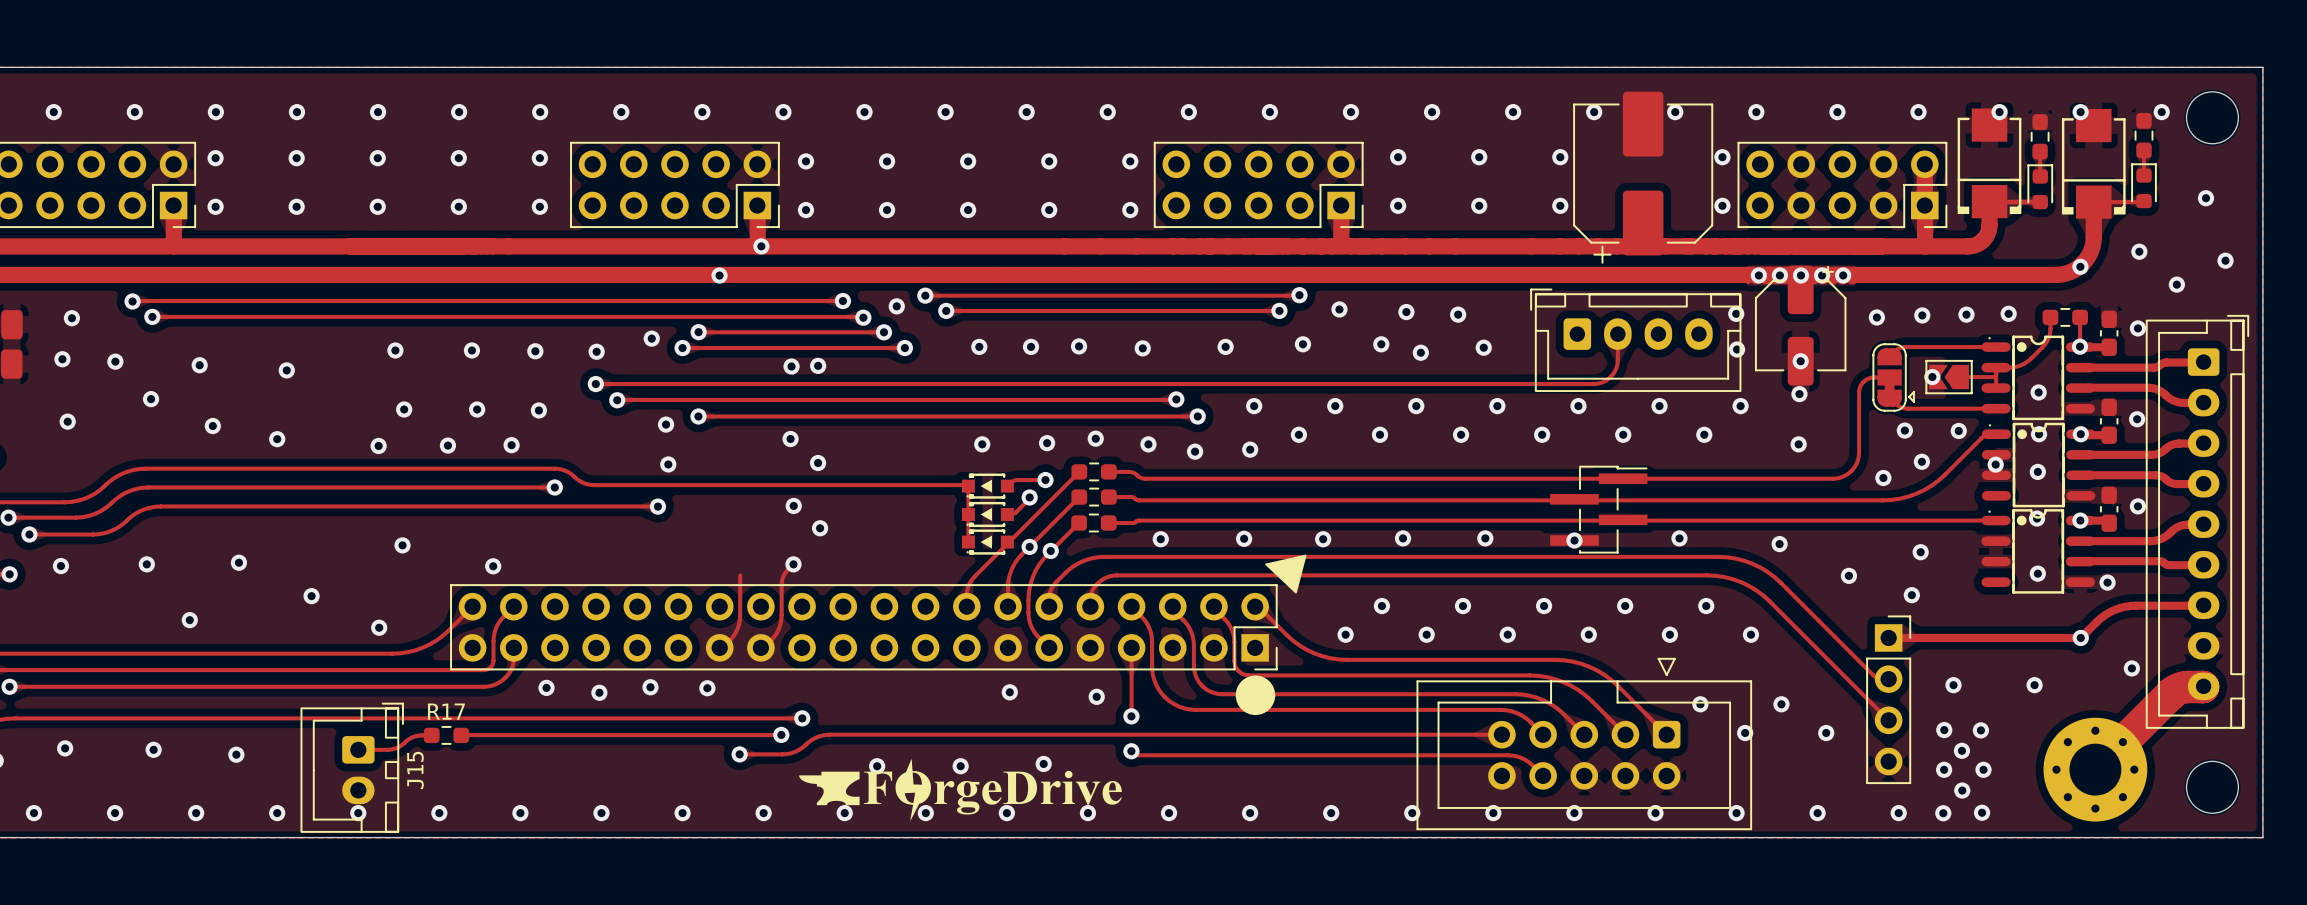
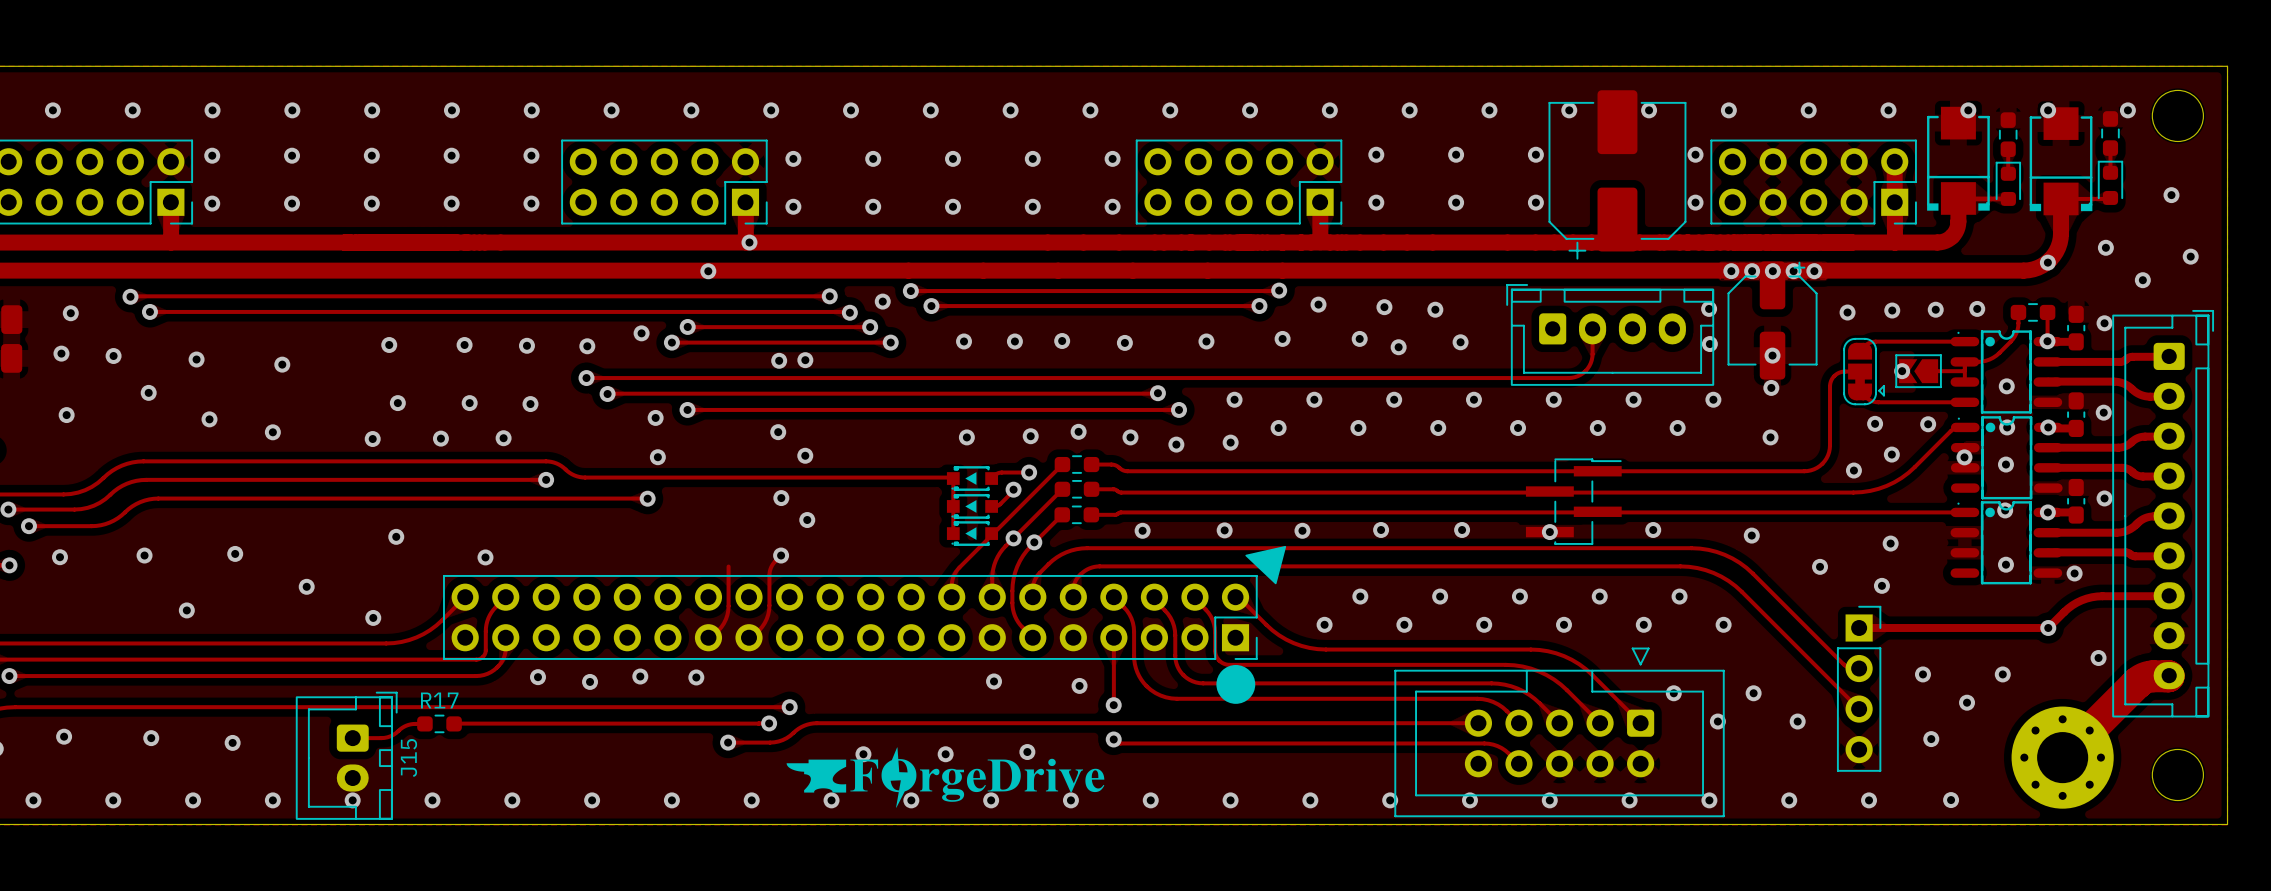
via: (1944, 730) -> none
via position: (1980, 730) -> (1967, 702)
via: (1944, 769) -> none
via: (1983, 769) -> none
via: (1962, 790) -> none
via: (1943, 813) -> none

